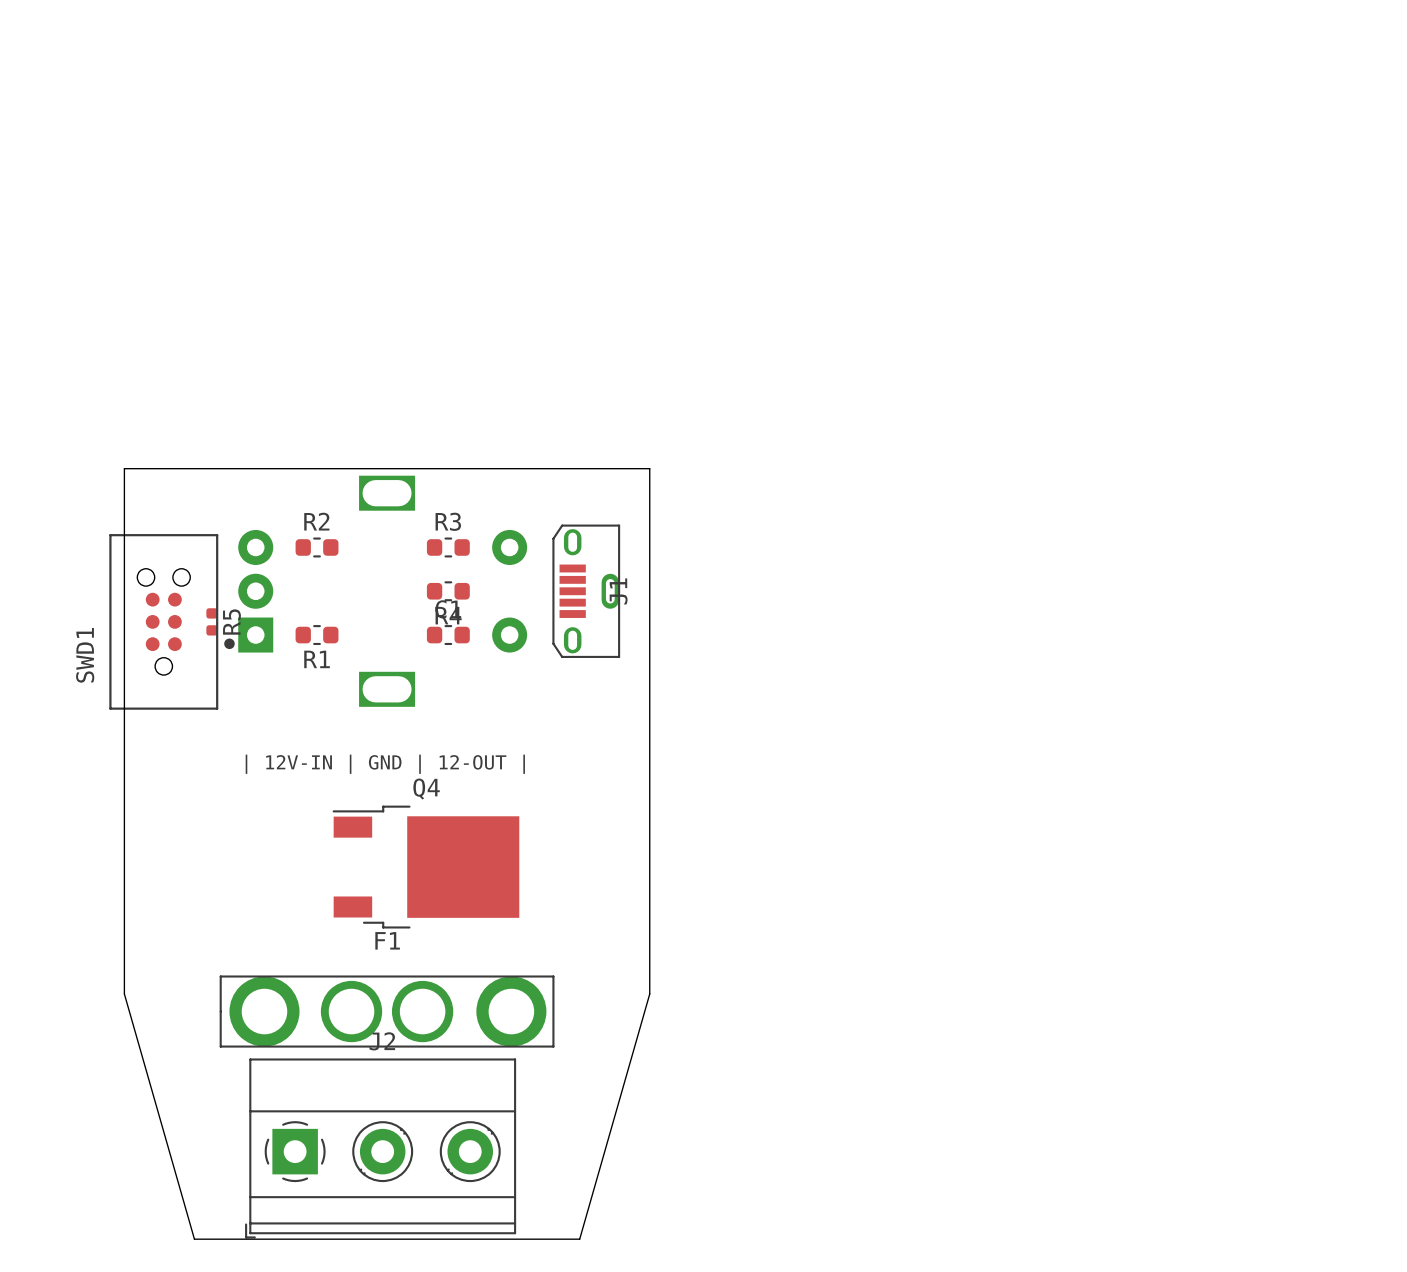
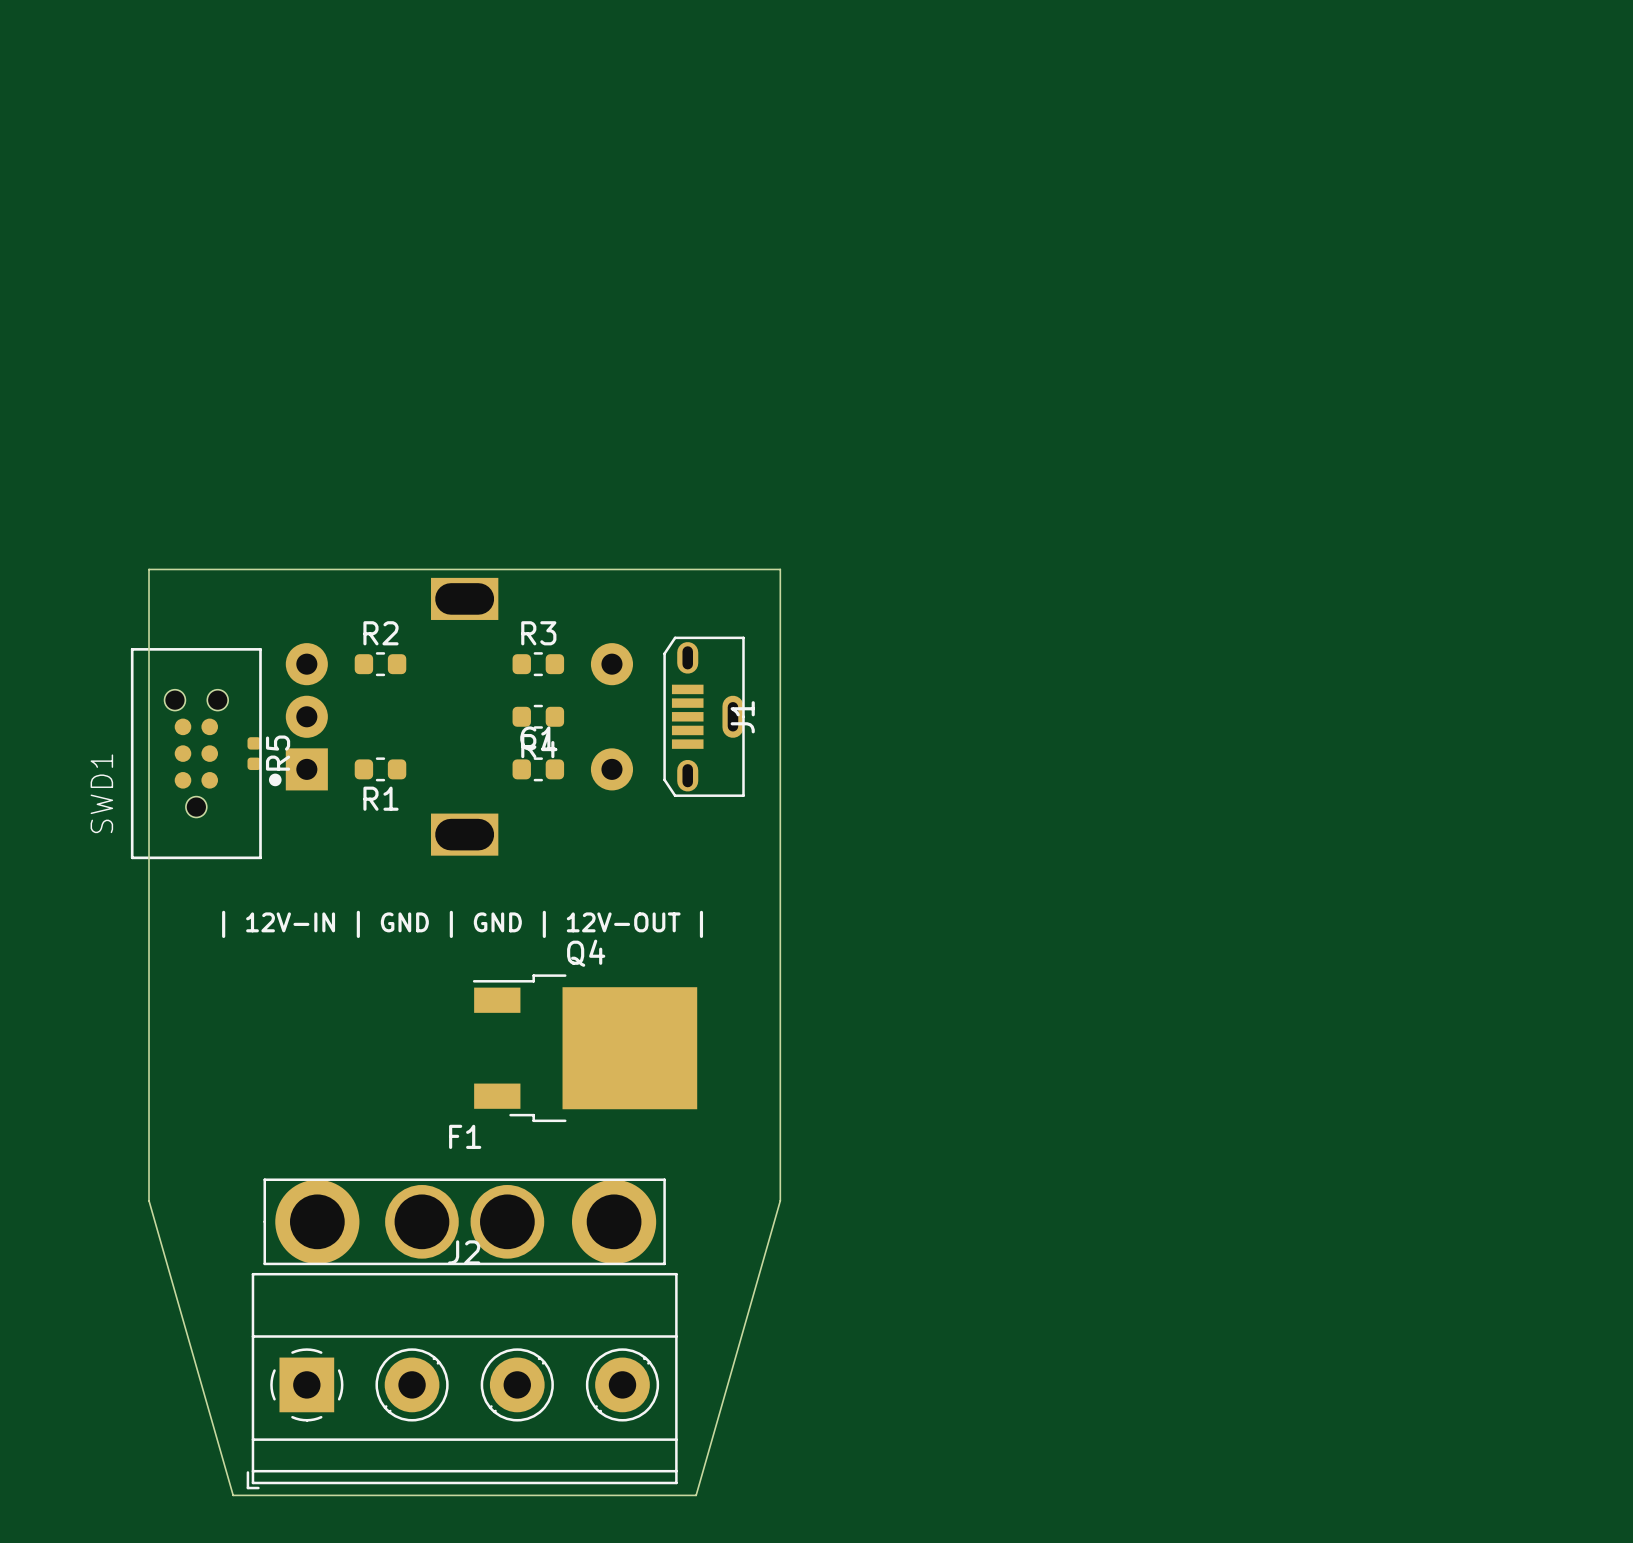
text: | 12V-IN | GND | 12-OUT | (385, 764) -> | 12V-IN | GND | GND | 12V-OUT | (462, 924)
Q4 position: (425, 867) -> (585, 1048)
J2 footprint: [245, 1058, 517, 1239] -> [246, 1272, 678, 1490]

